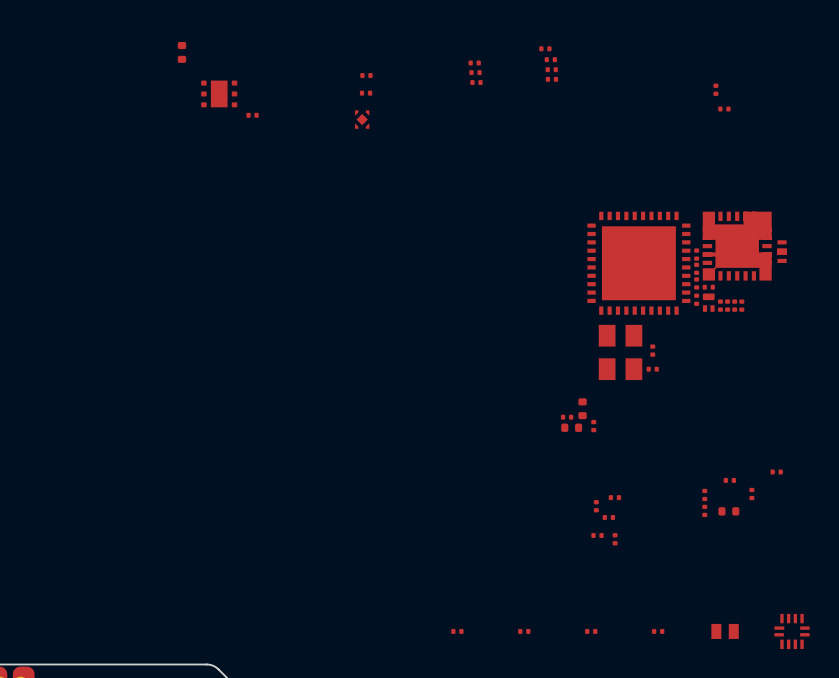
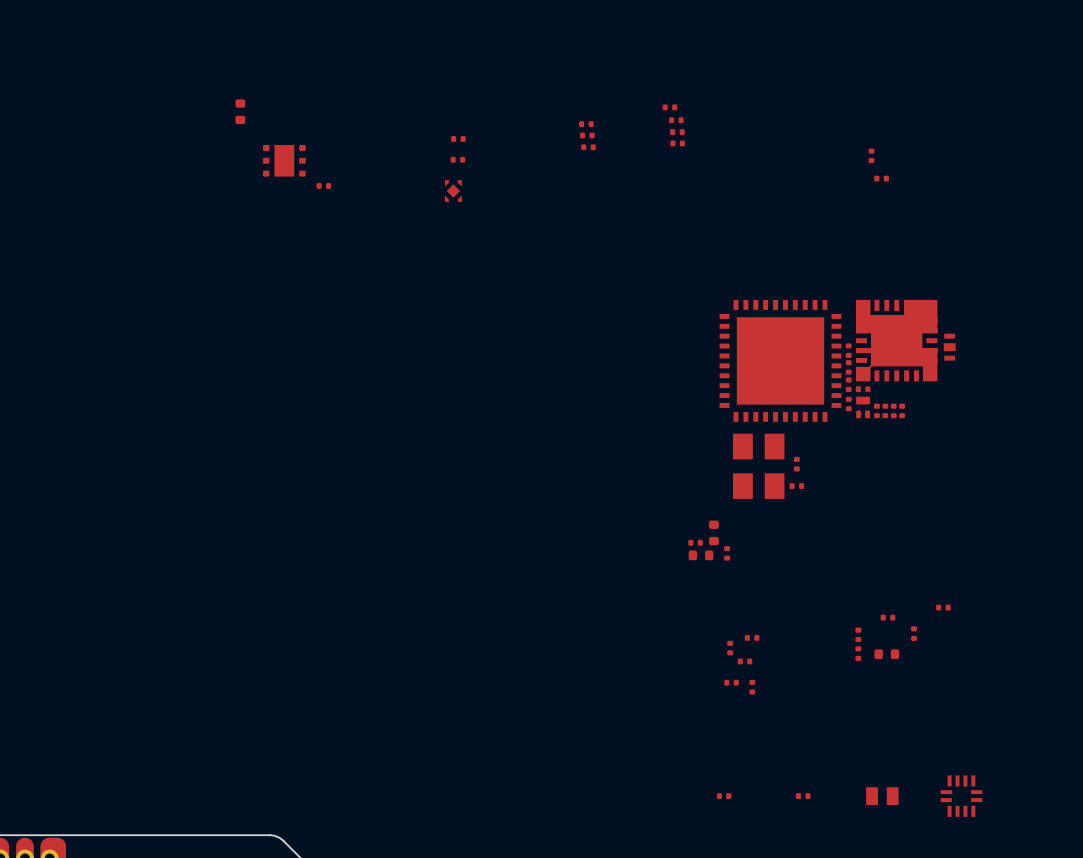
part: (457, 631) -> none
part: (524, 631) -> none

